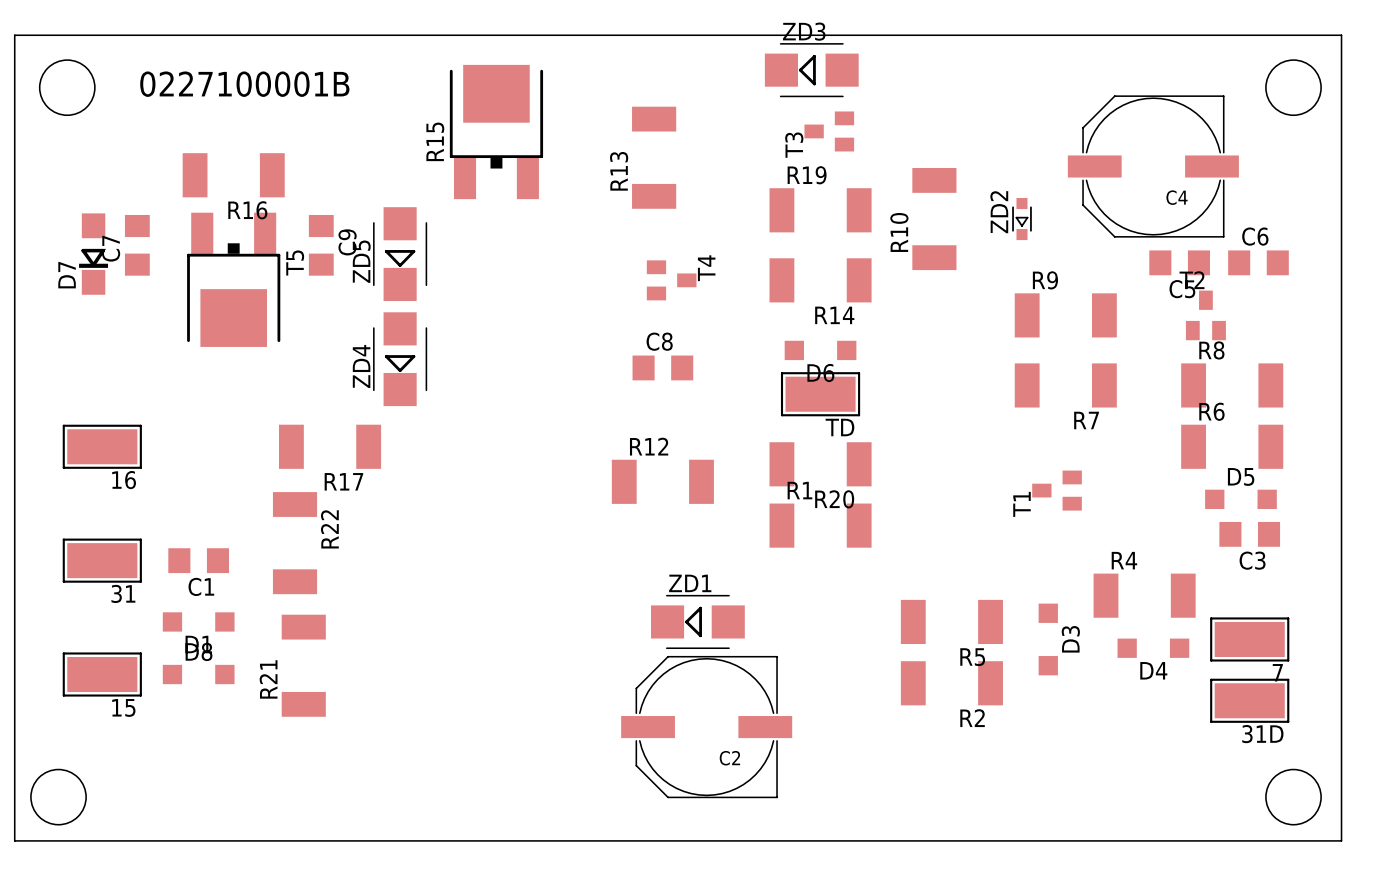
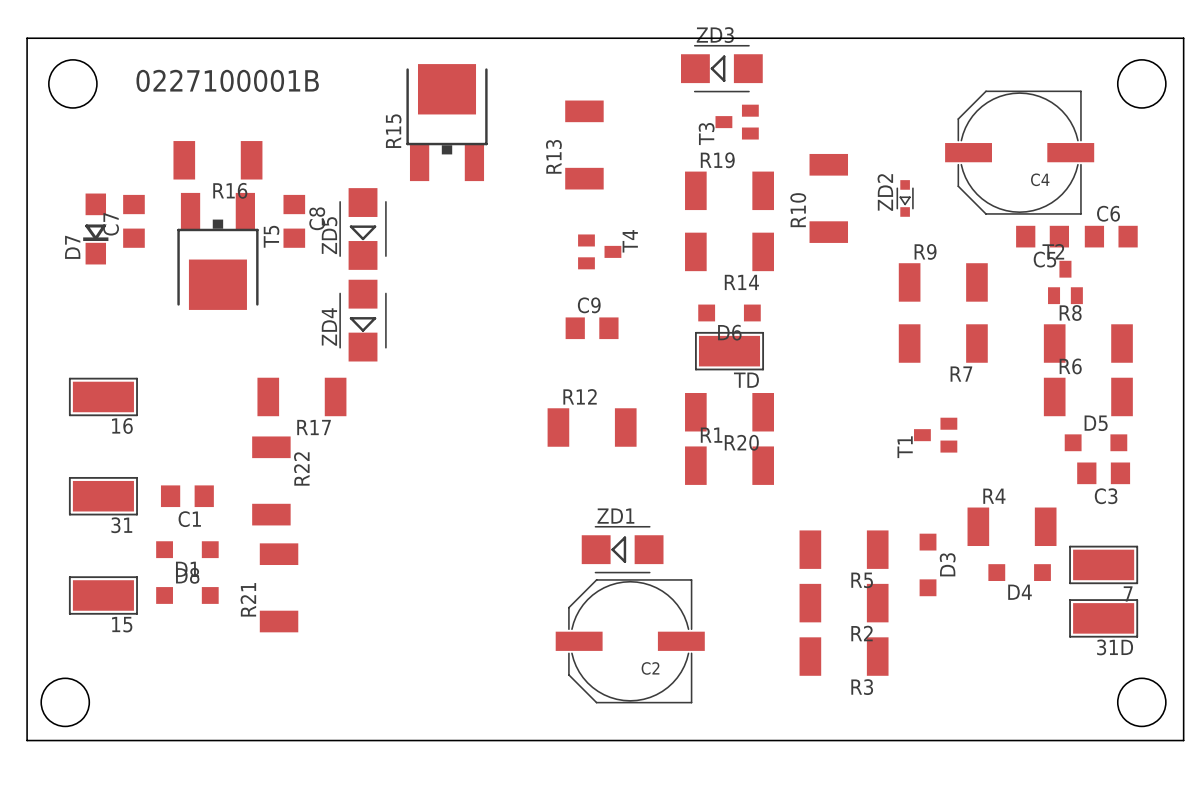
C9 name: C9 (347, 242) -> C8 (317, 218)
C8 name: C8 (659, 341) -> C9 (589, 305)
R3: none -> (844, 656)

